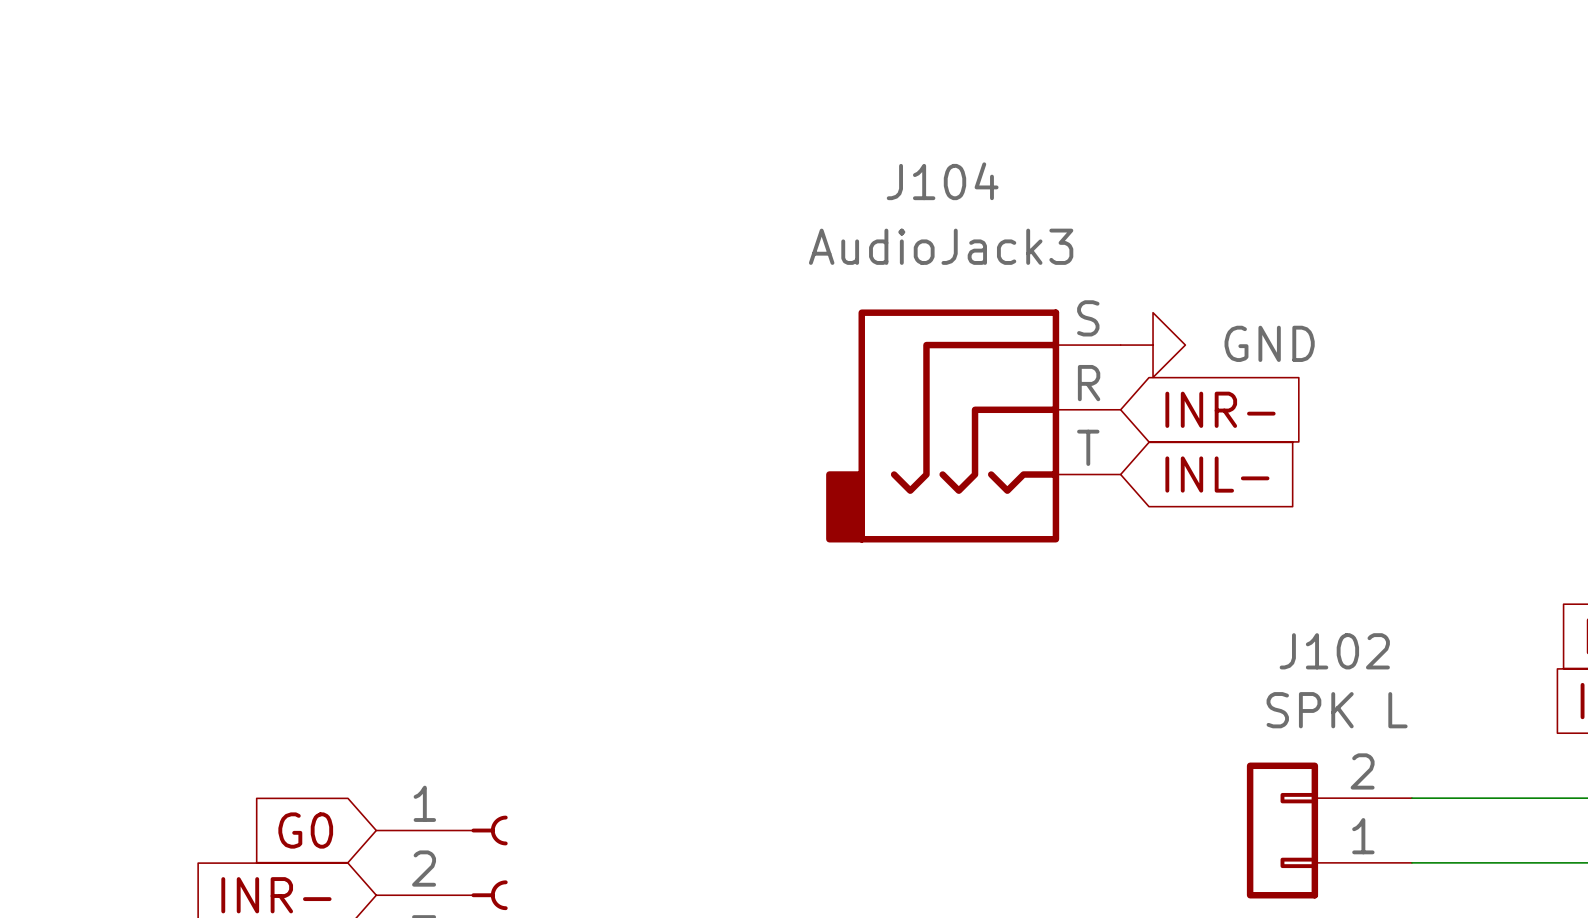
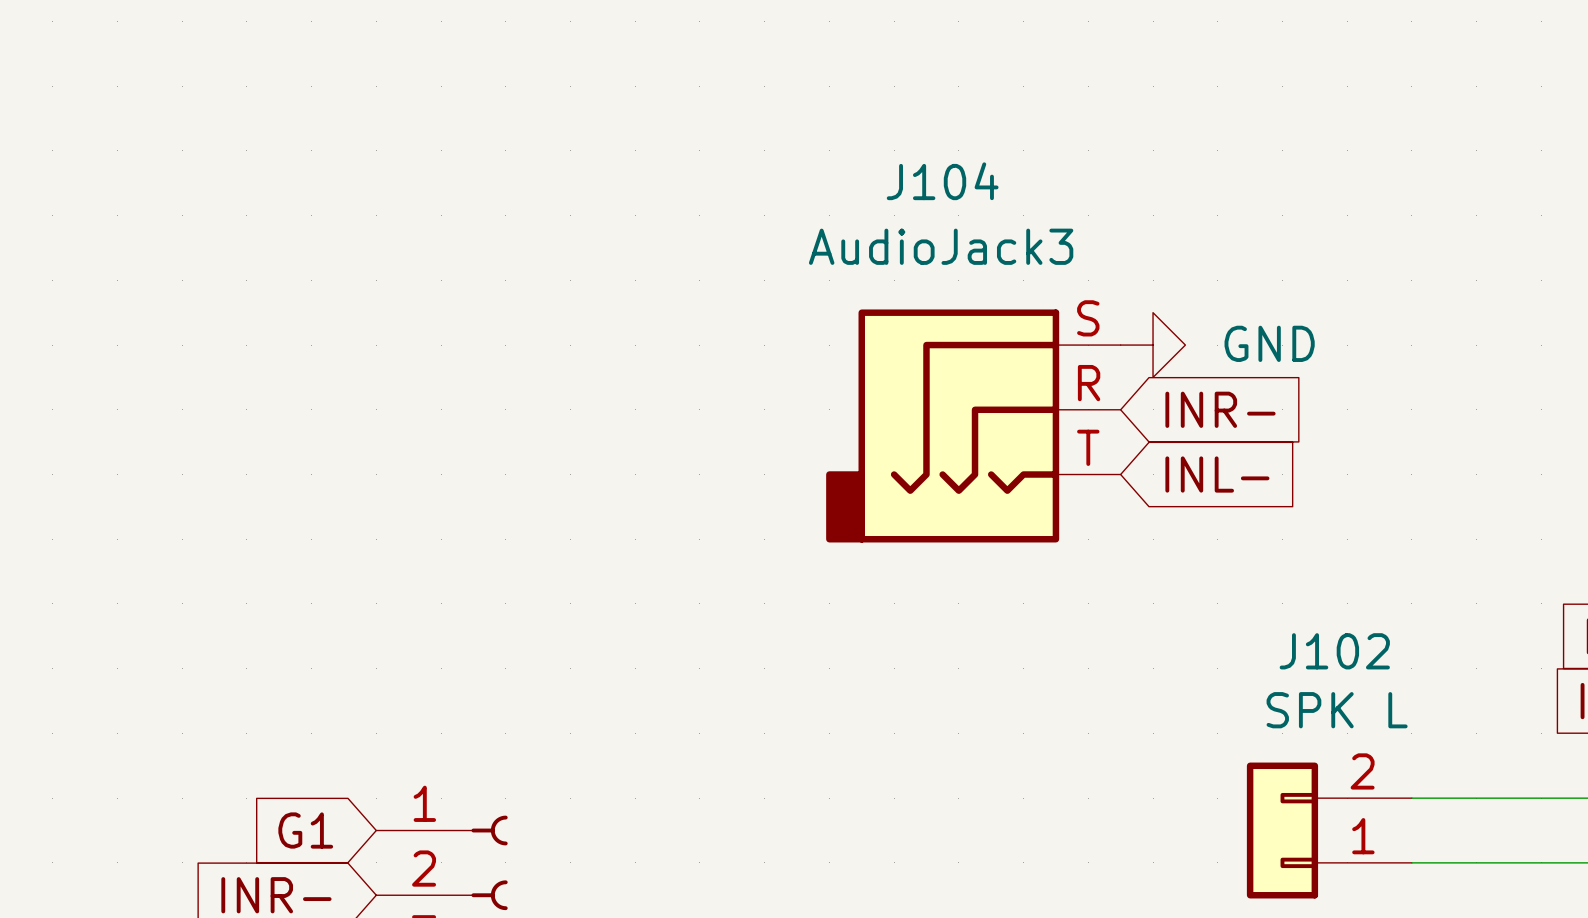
global label: G0 (305, 830) -> G1 (305, 830)

